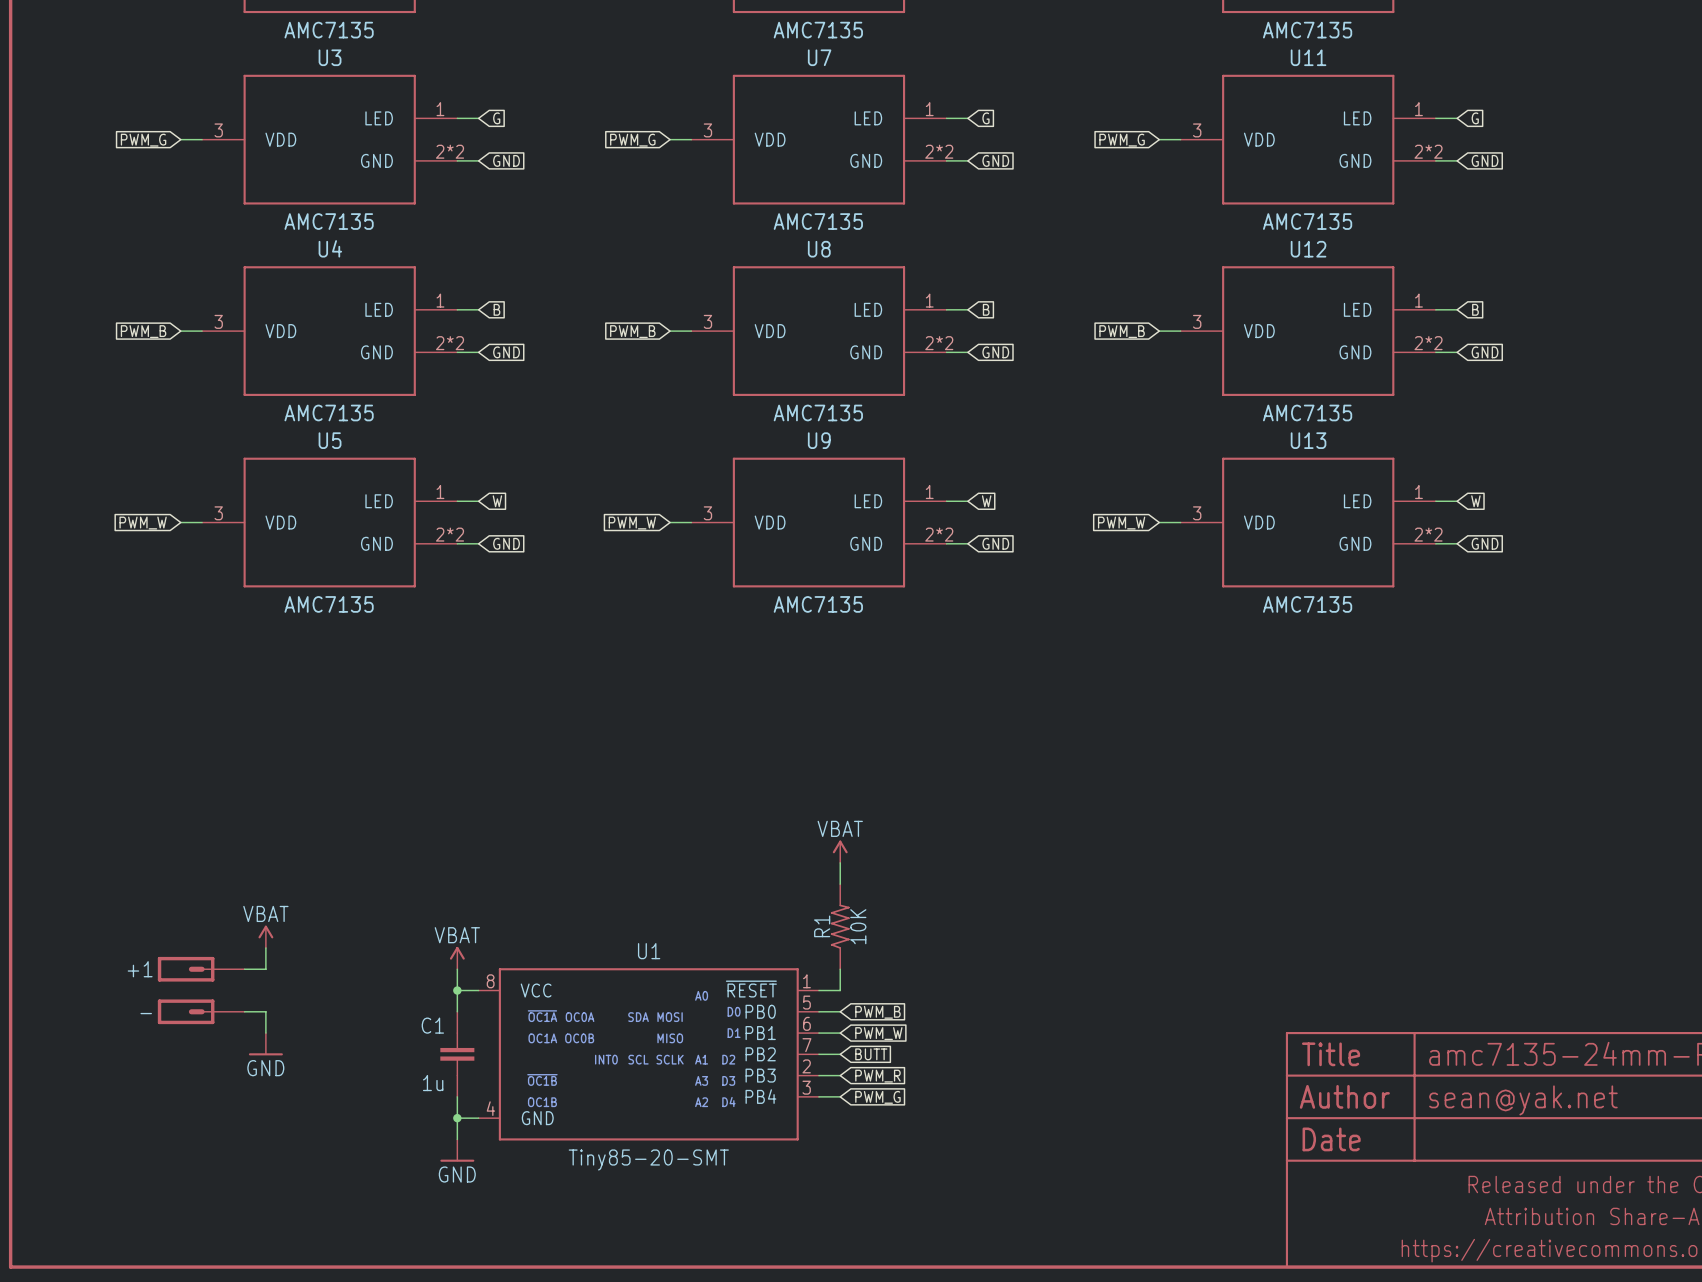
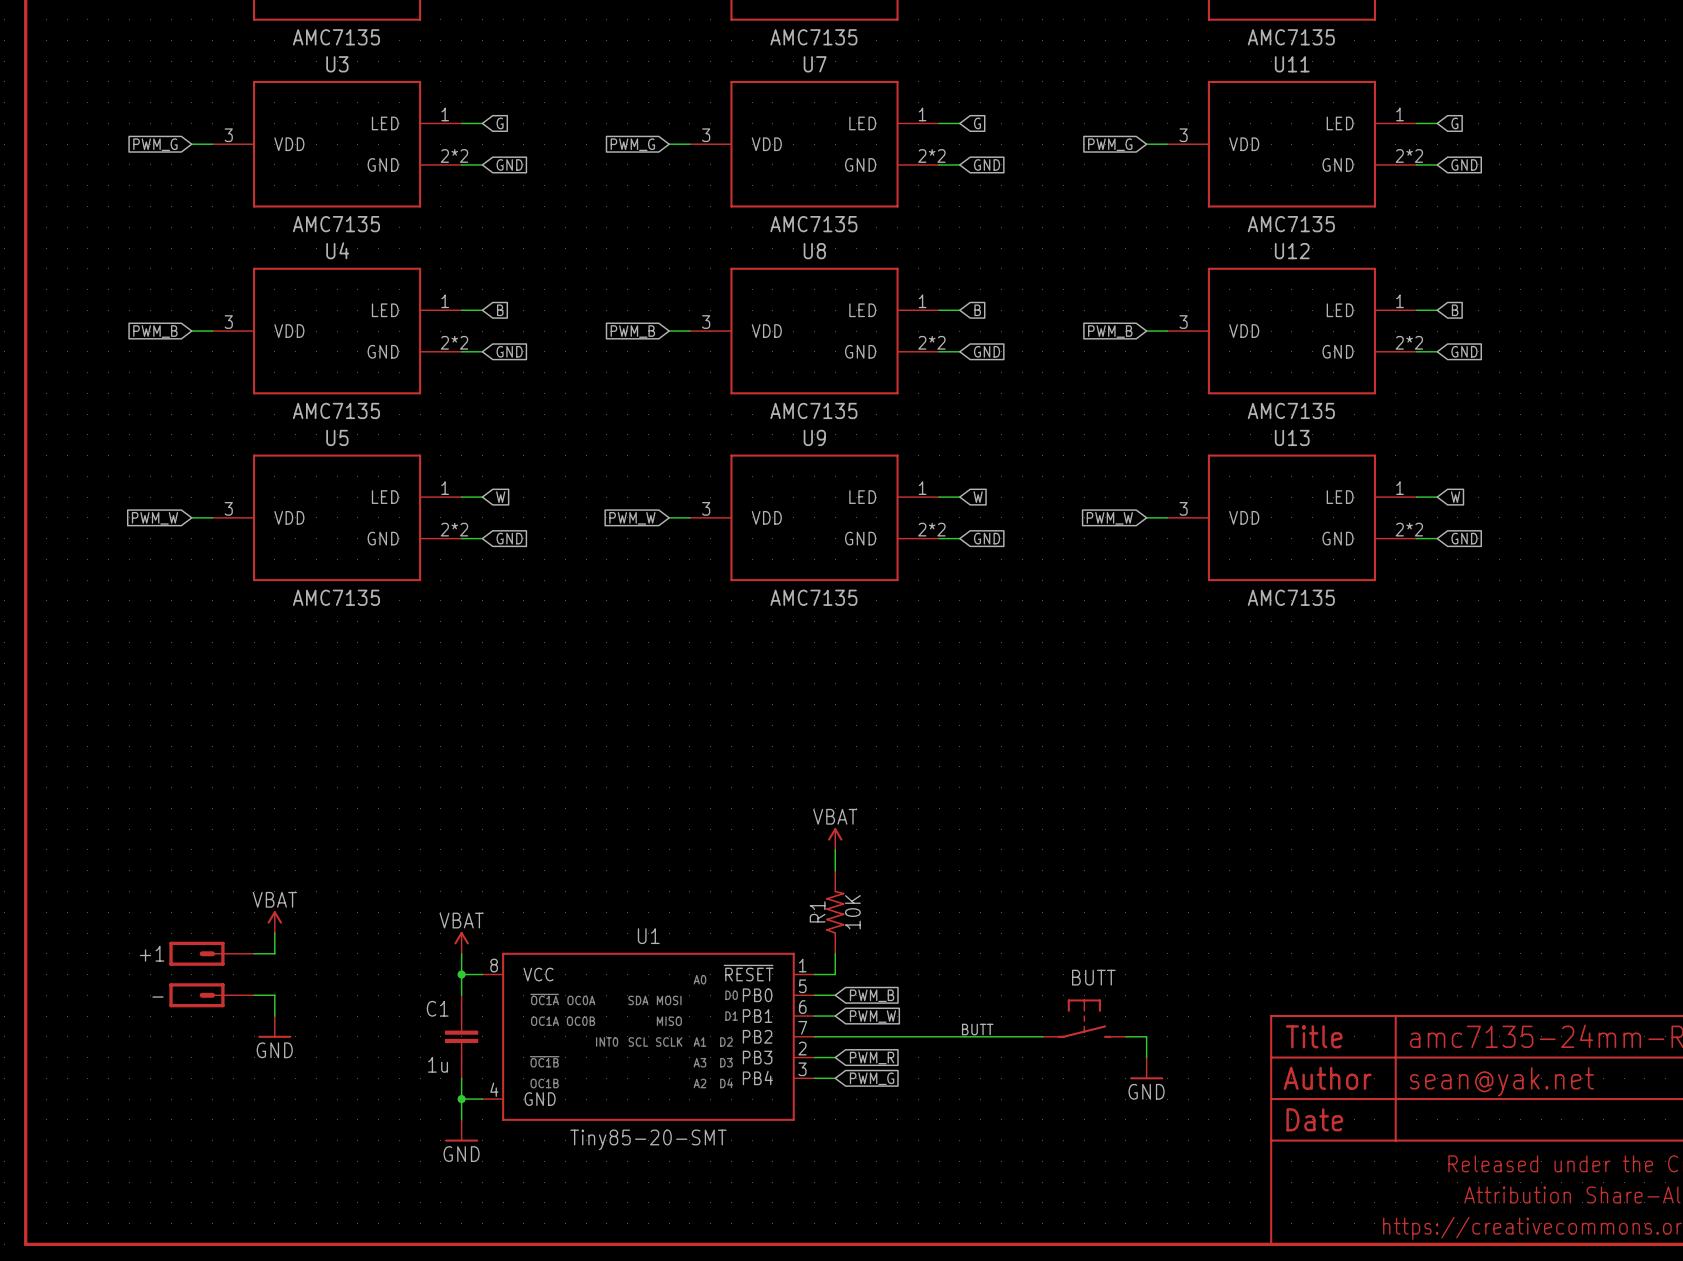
BUTT: none -> (1084, 1018)
label: none -> BUTT (977, 1029)
wire: none -> (835, 1036) (1042, 1036)
global label: BUTT (871, 1054) -> none
wire: none -> (1125, 1036) (1146, 1036) (1146, 1057)
power symbol: none -> GND (1146, 1068)

